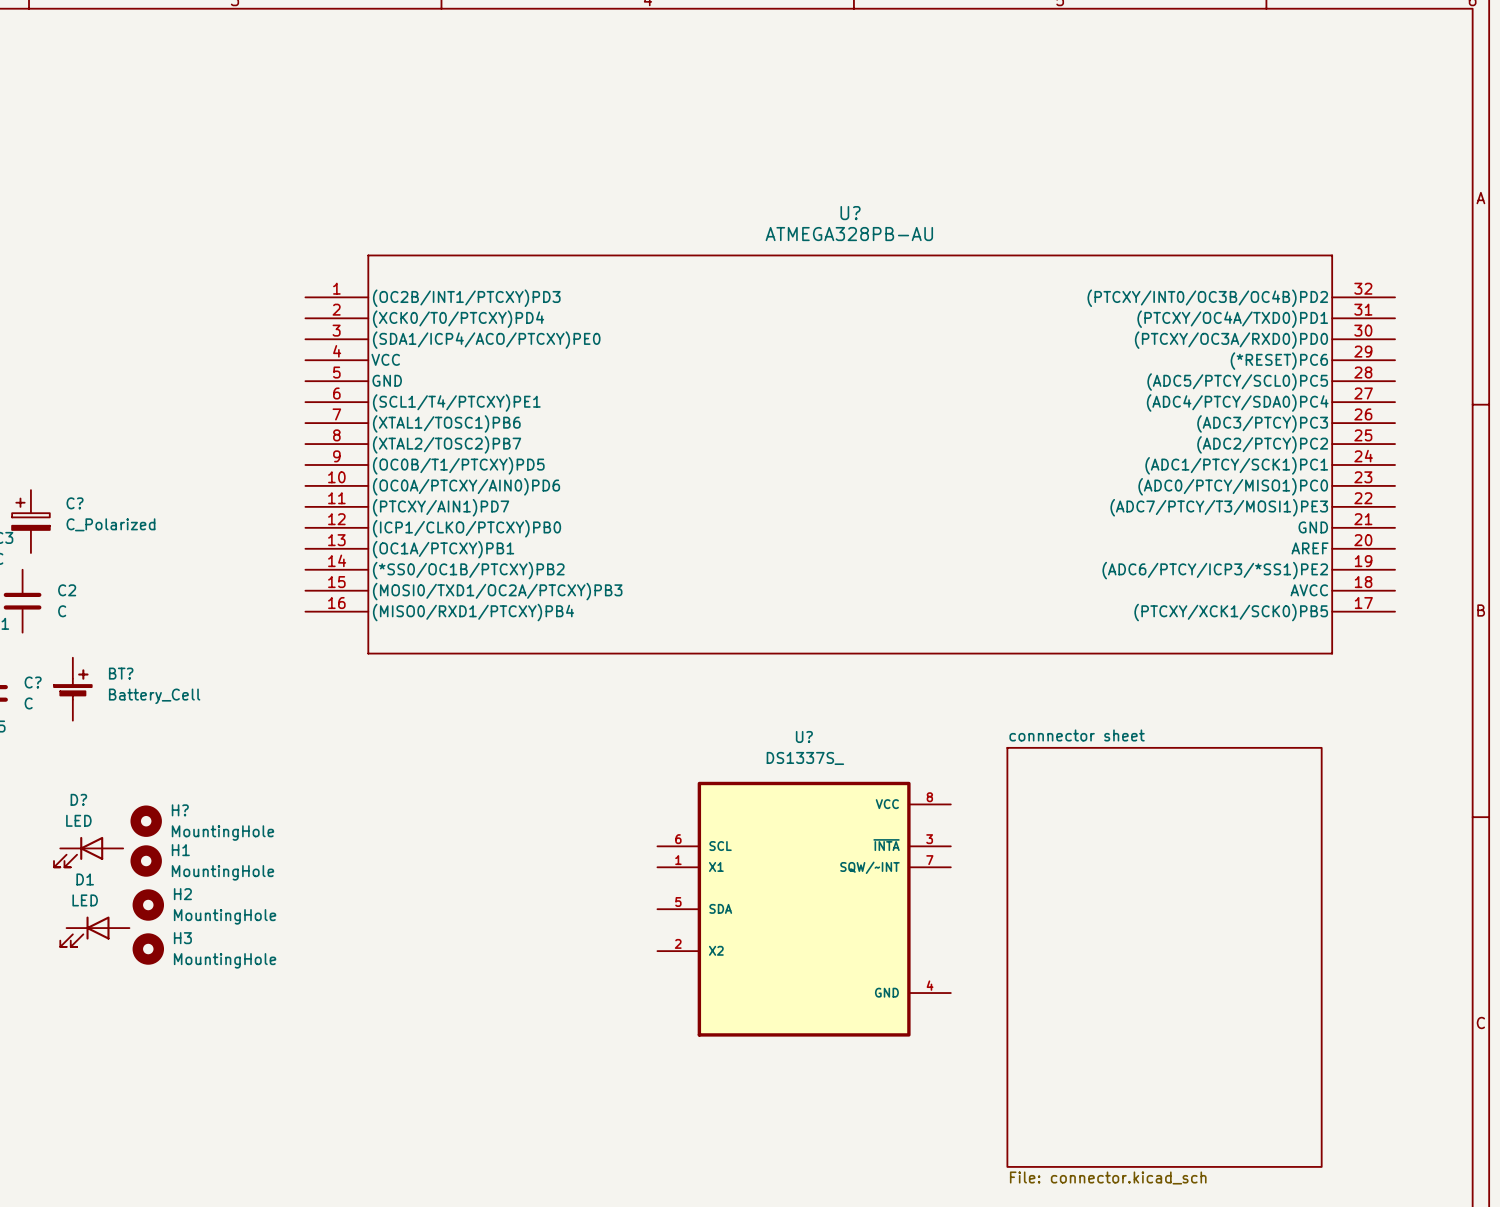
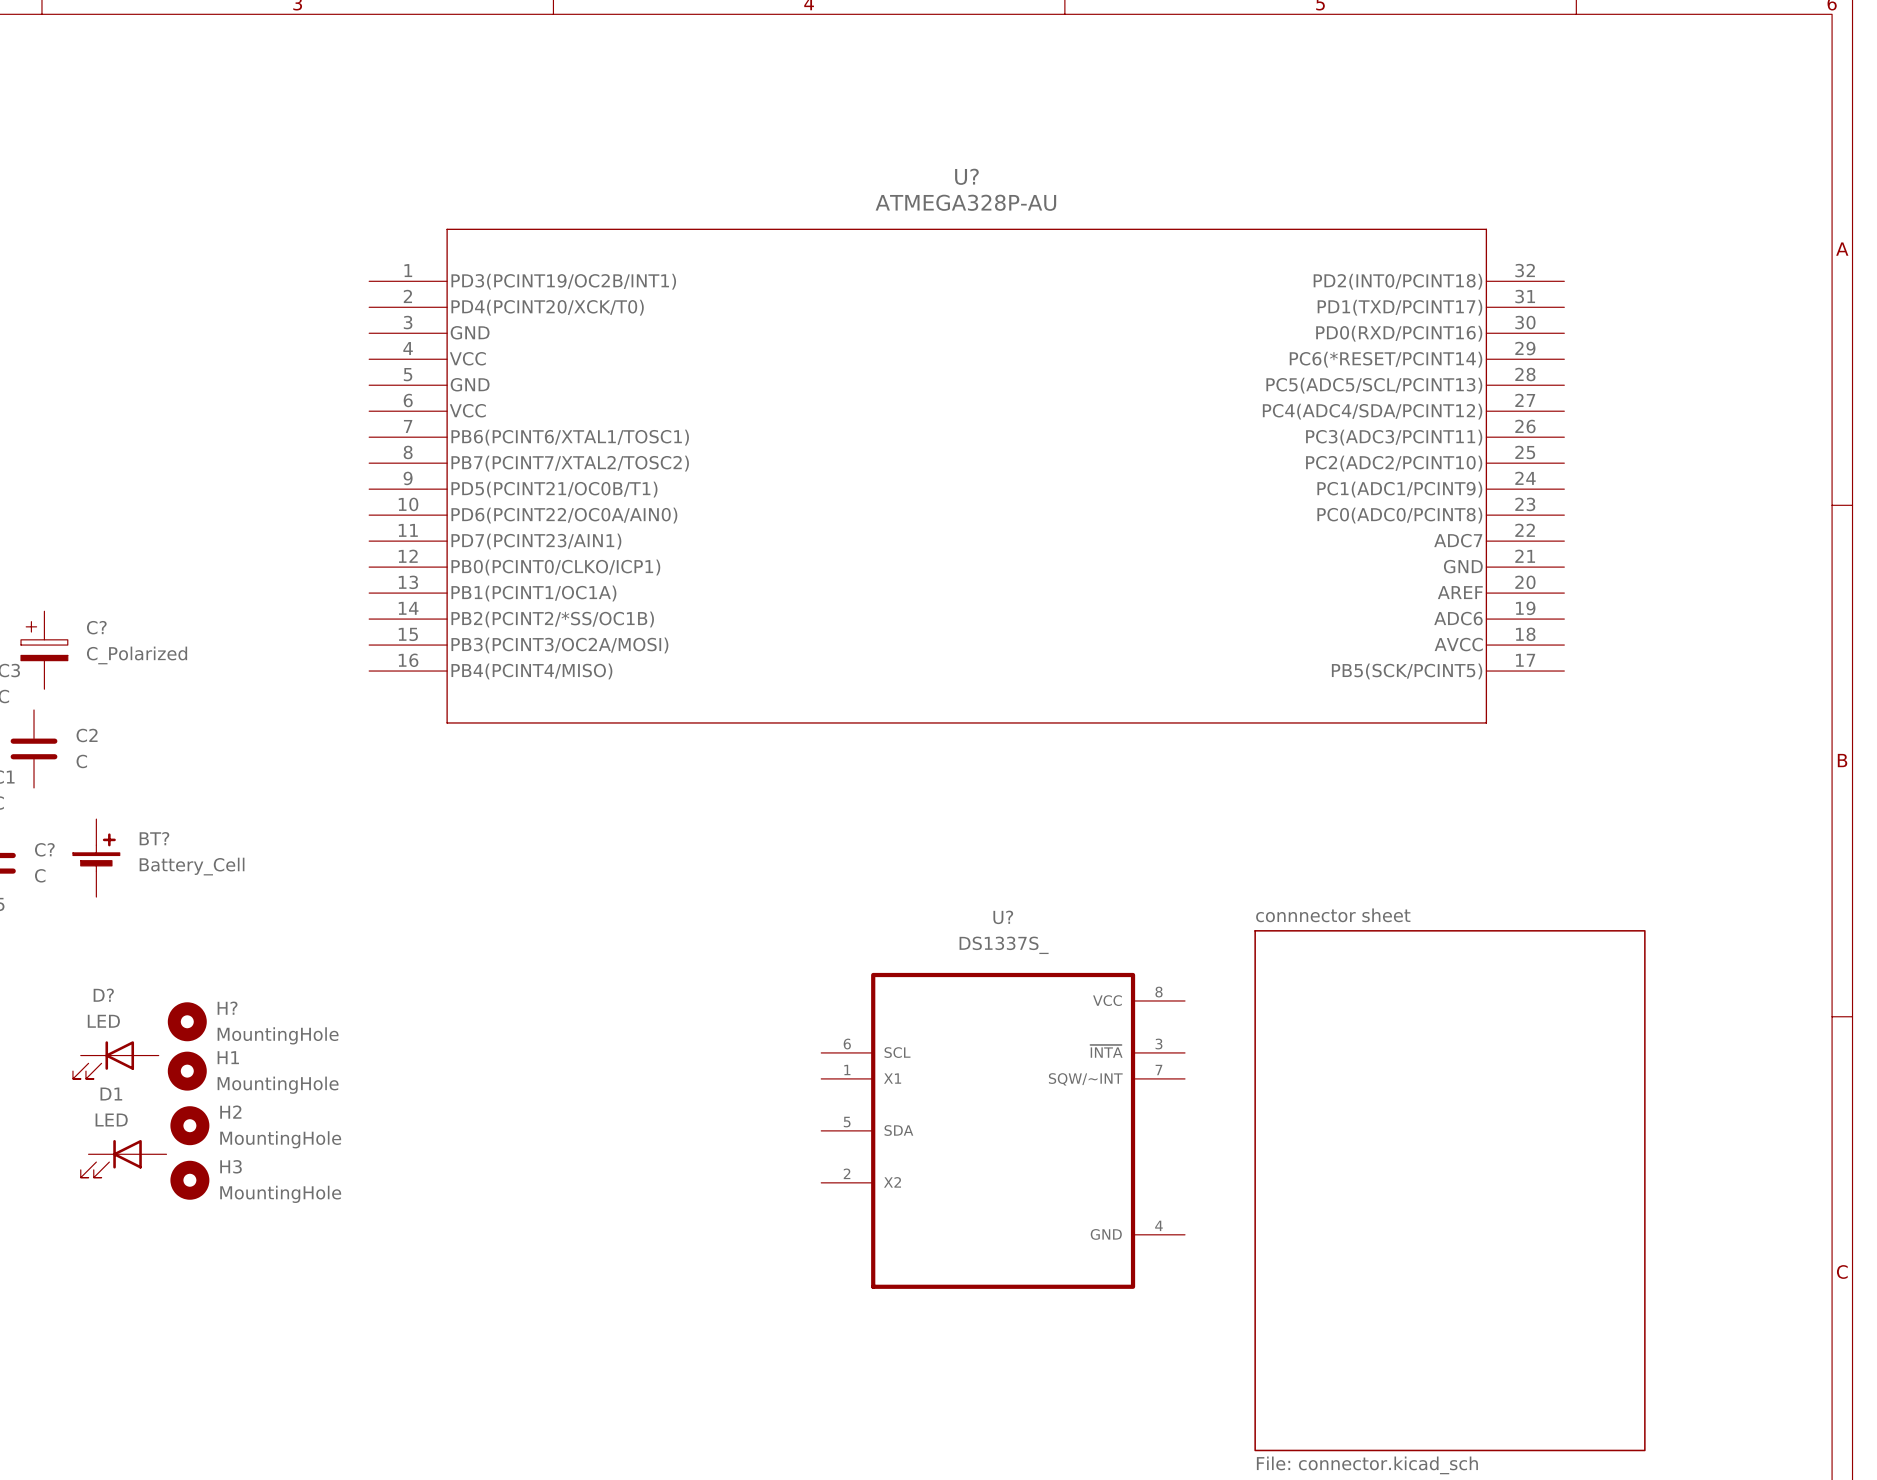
U?: none -> ATMEGA328P-AU (966, 476)
U?: ATMEGA328PB-AU (850, 454) -> none

